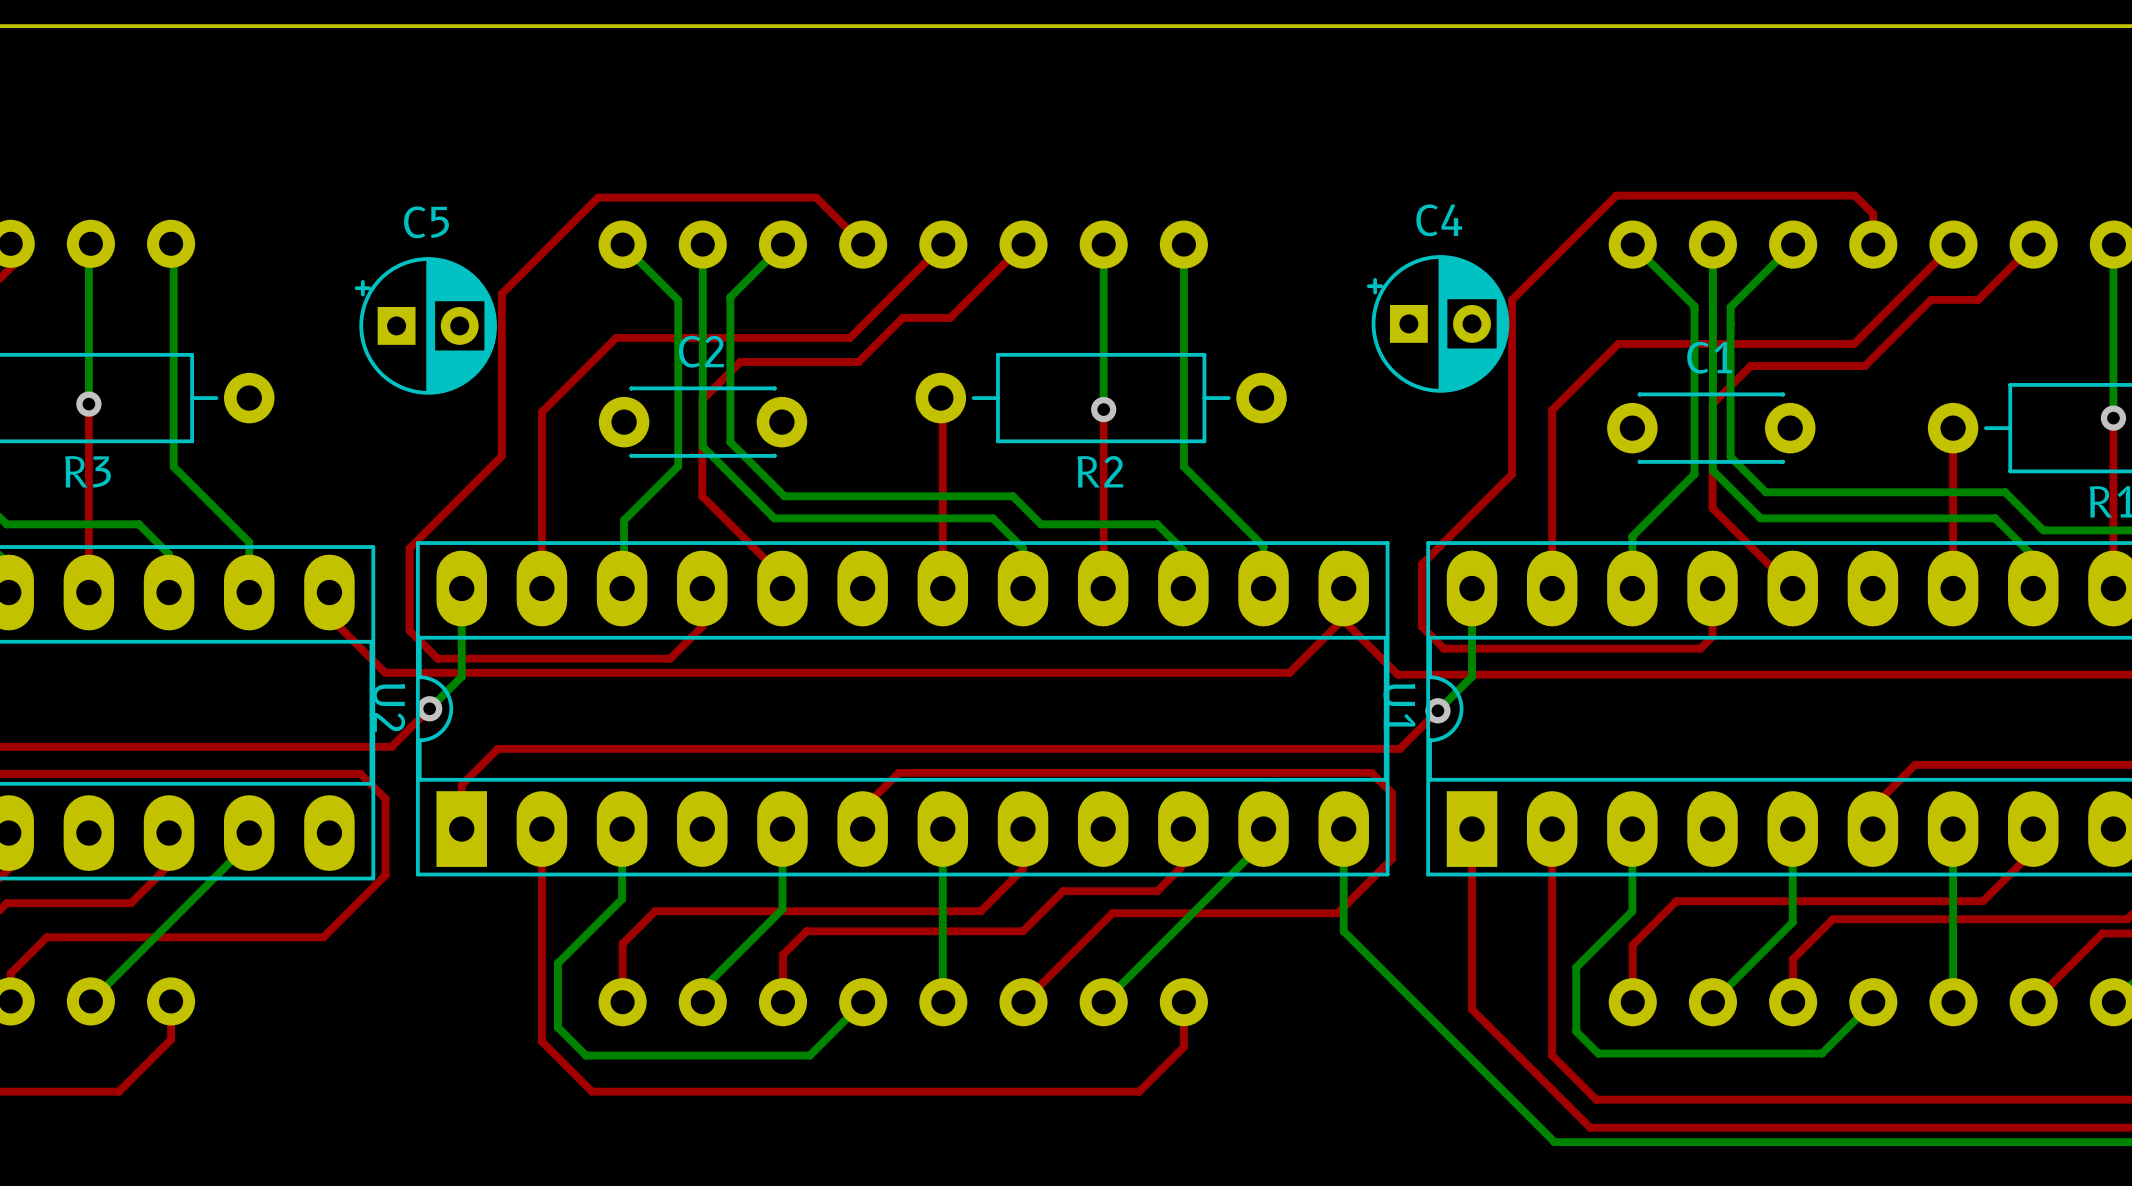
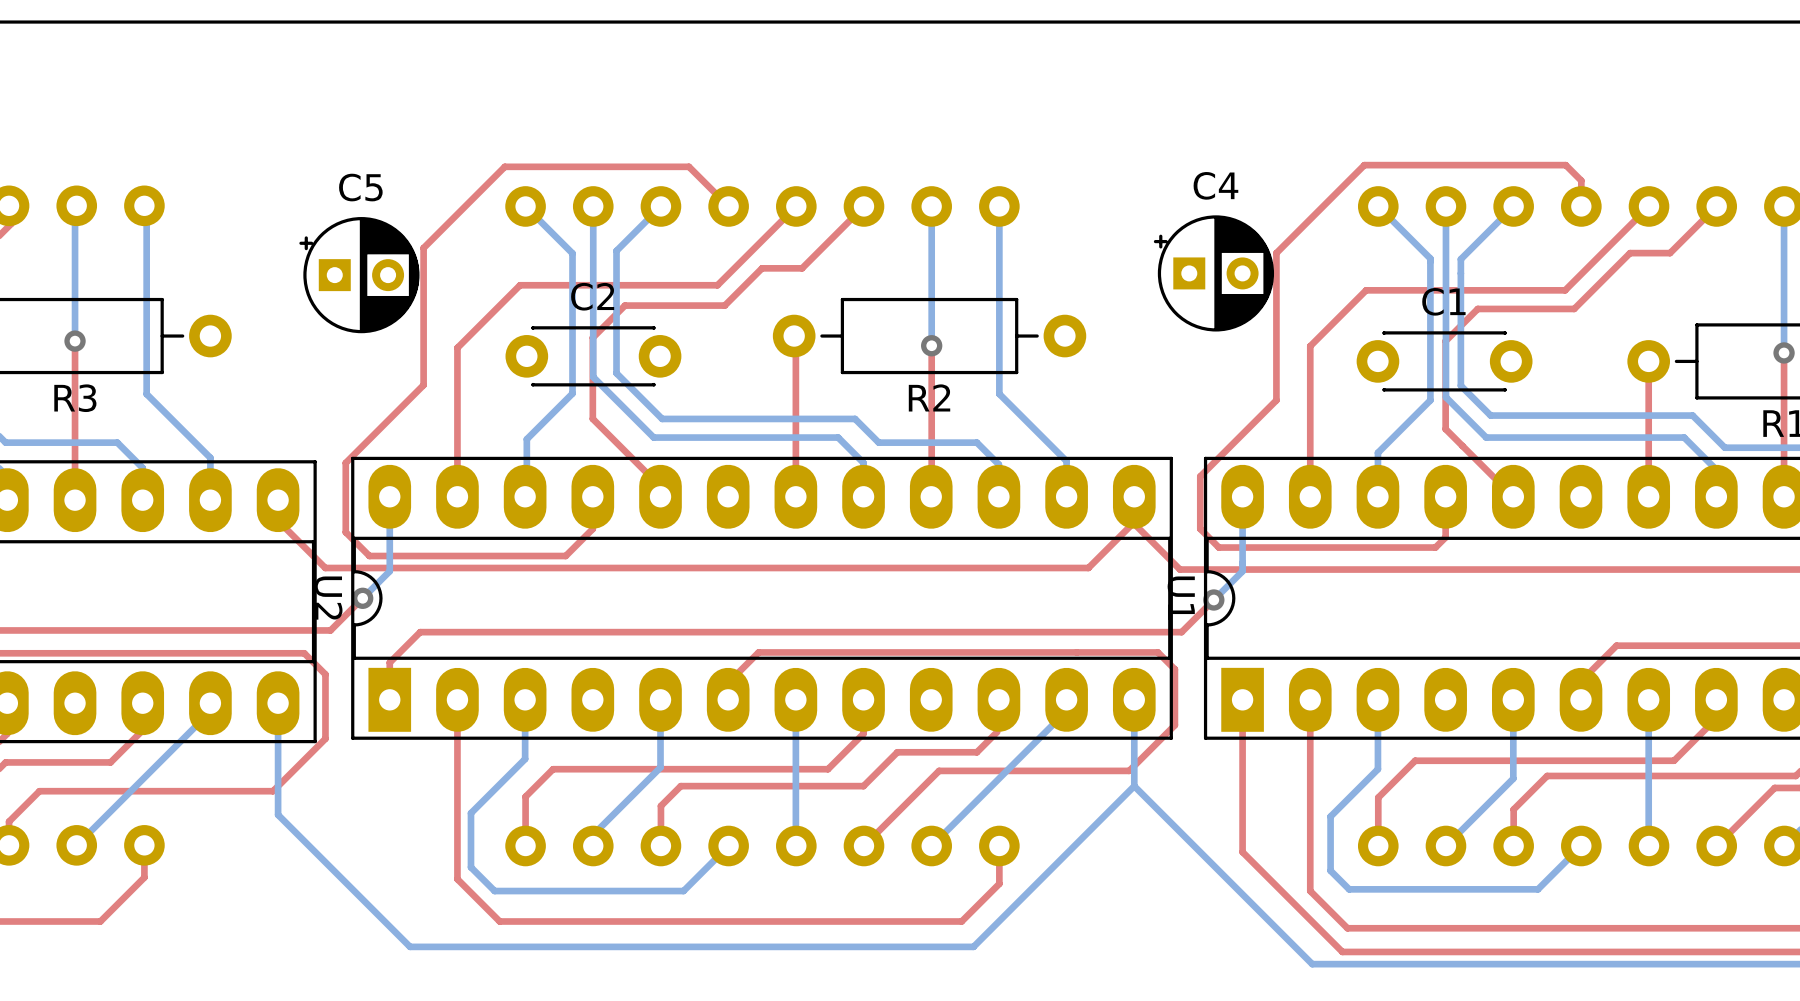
bottom track: none -> (278, 703) (278, 814) (410, 946) (973, 946) (1134, 786)

